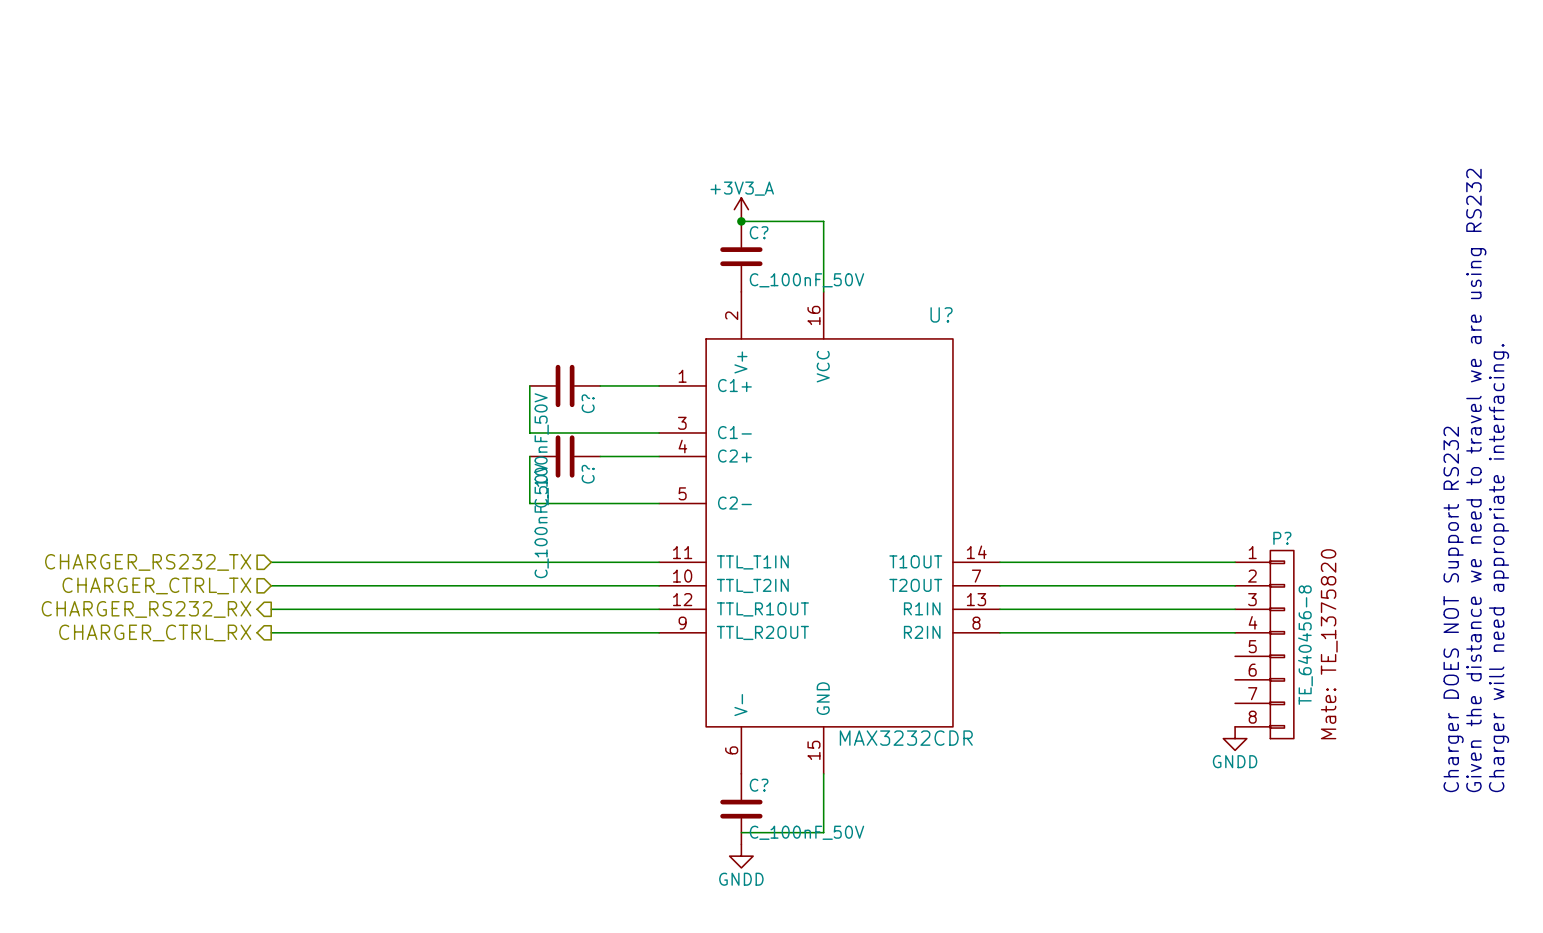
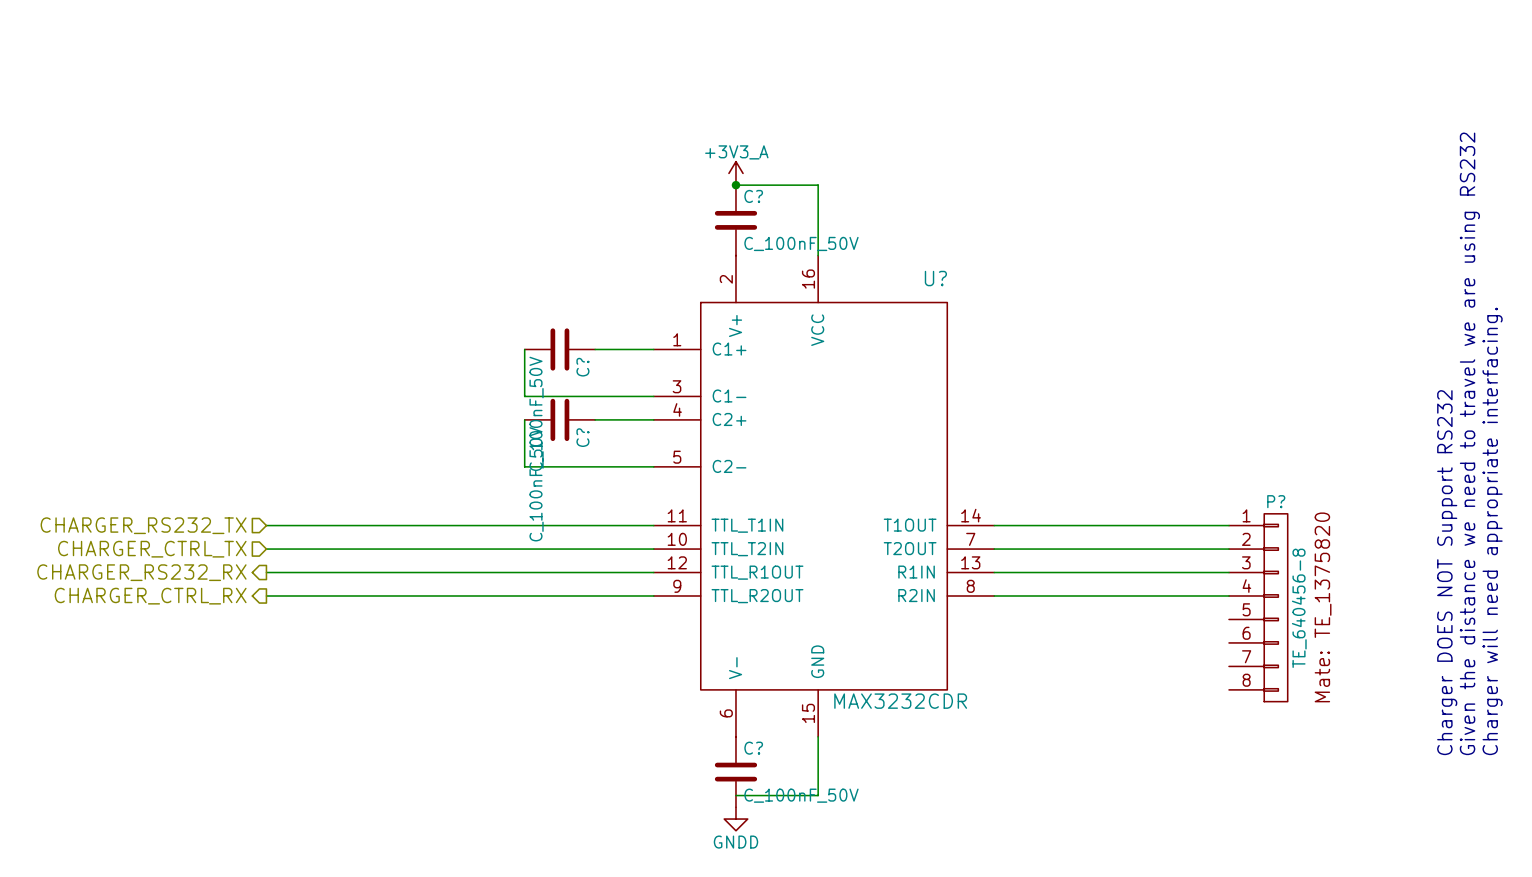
power symbol: GNDD (1235, 738) -> none

